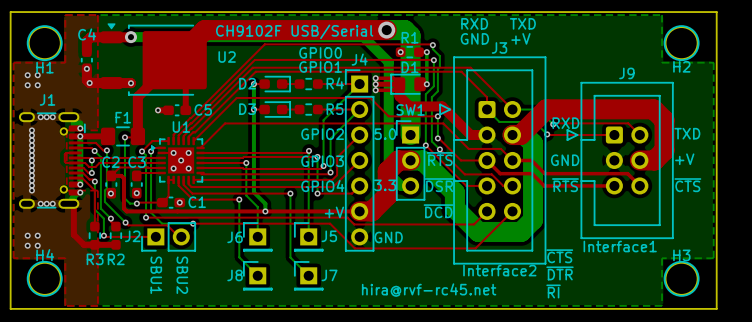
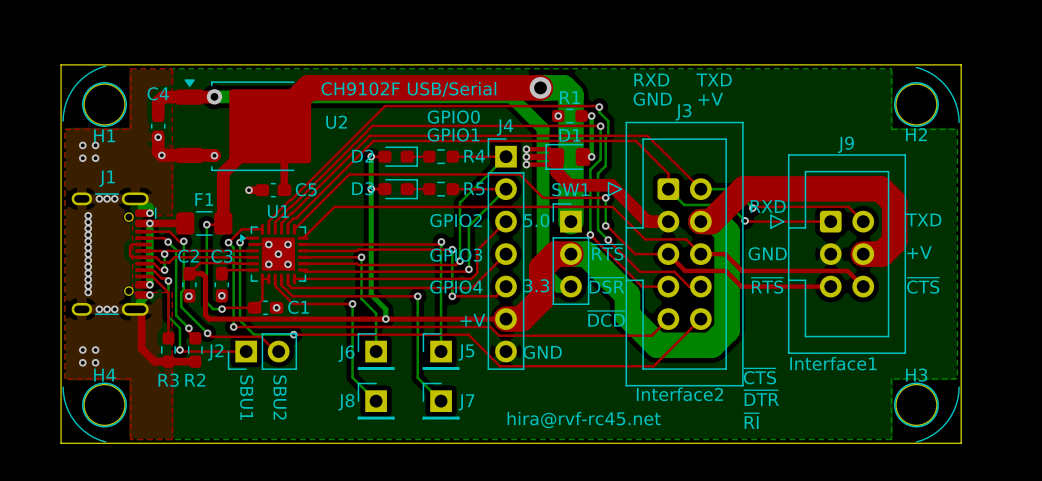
line: none -> (105, 66) (88, 73) (75, 86) (66, 102) (63, 121)
line: none -> (916, 67) (933, 74) (947, 87) (956, 104) (959, 122)
line: none -> (63, 387) (66, 405) (75, 421) (88, 434) (105, 442)
line: none -> (959, 387) (956, 405) (947, 421) (933, 434) (916, 442)

